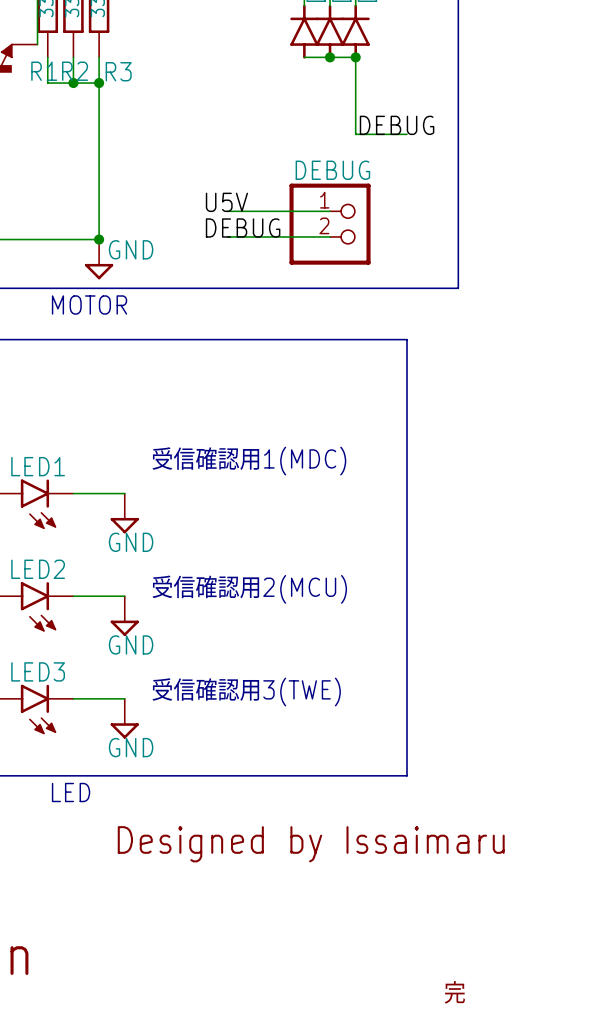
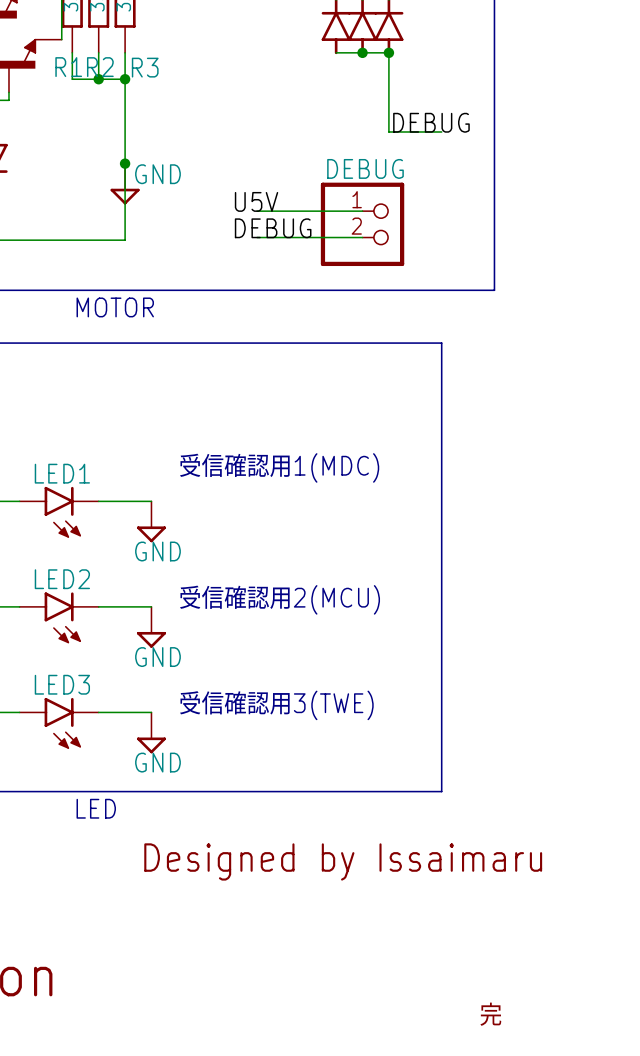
junction: none -> (125, 163)
junction: (99, 239) -> none
power symbol position: GND (99, 259) -> GND (125, 184)

